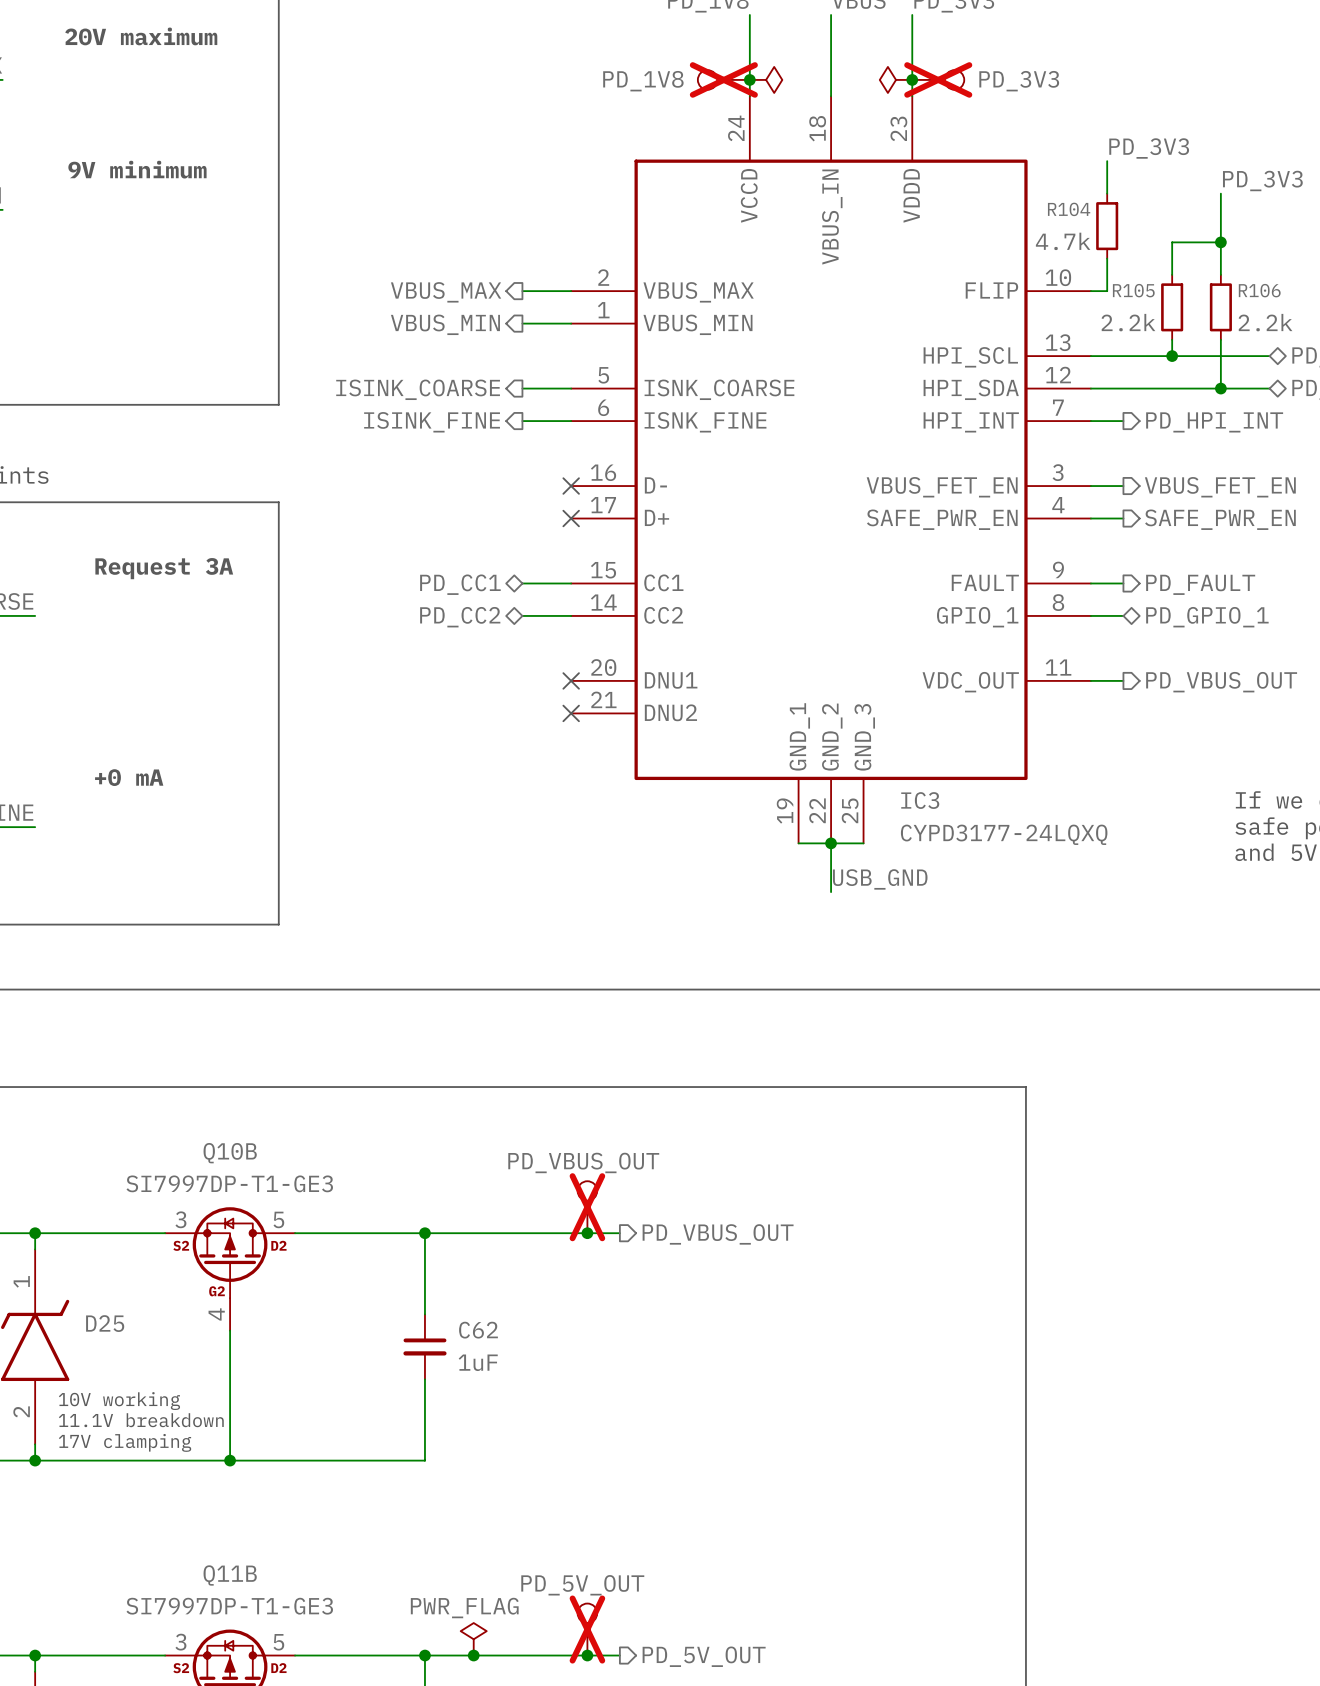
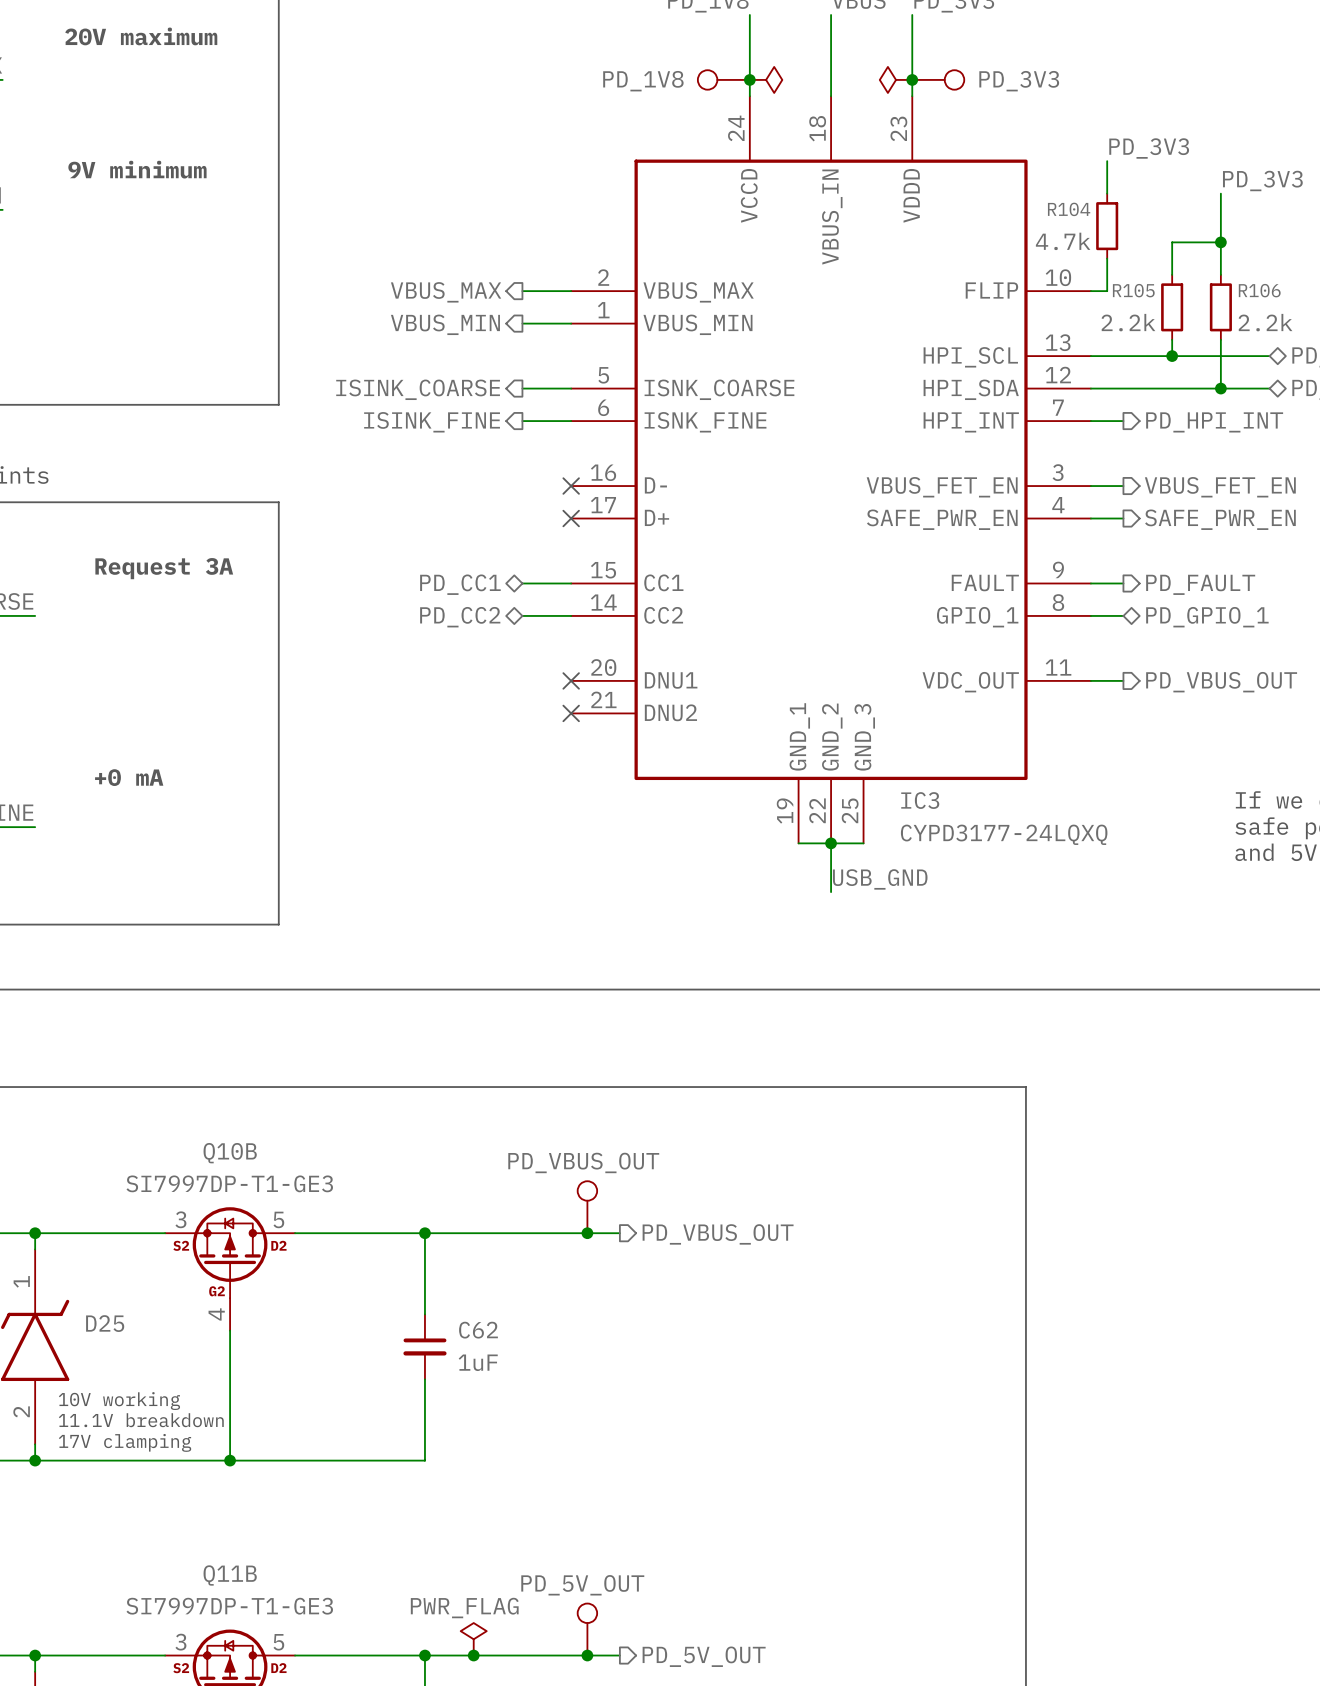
part do-not-place cross: (723, 79) -> none
part do-not-place cross: (938, 79) -> none
part do-not-place cross: (587, 1207) -> none
part do-not-place cross: (587, 1629) -> none

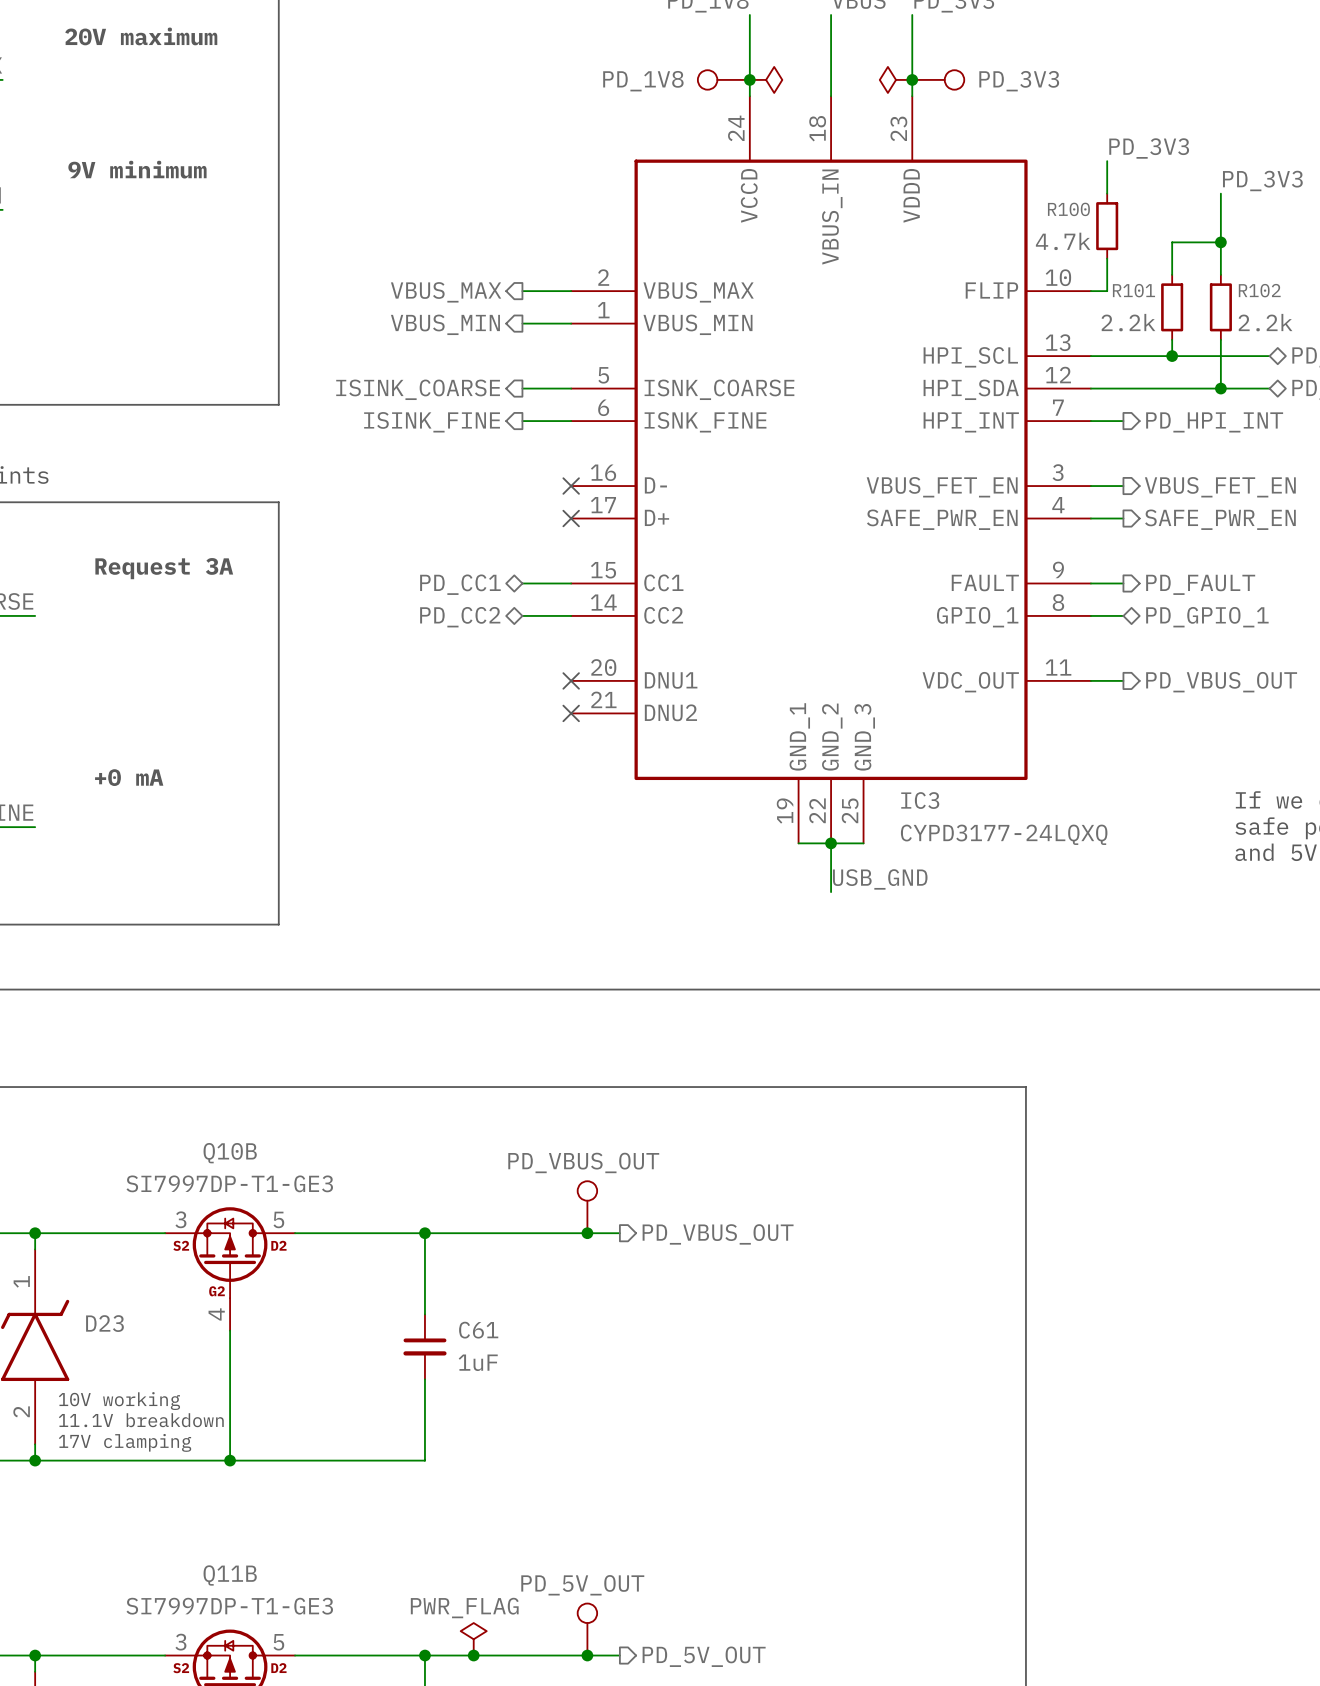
R104 name: R104 (1069, 209) -> R100 (1068, 209)
R105 name: R105 (1133, 290) -> R101 (1133, 290)
R106 name: R106 (1259, 290) -> R102 (1259, 290)
D25 name: D25 (105, 1323) -> D23 (104, 1323)
C62 name: C62 (478, 1330) -> C61 (478, 1330)

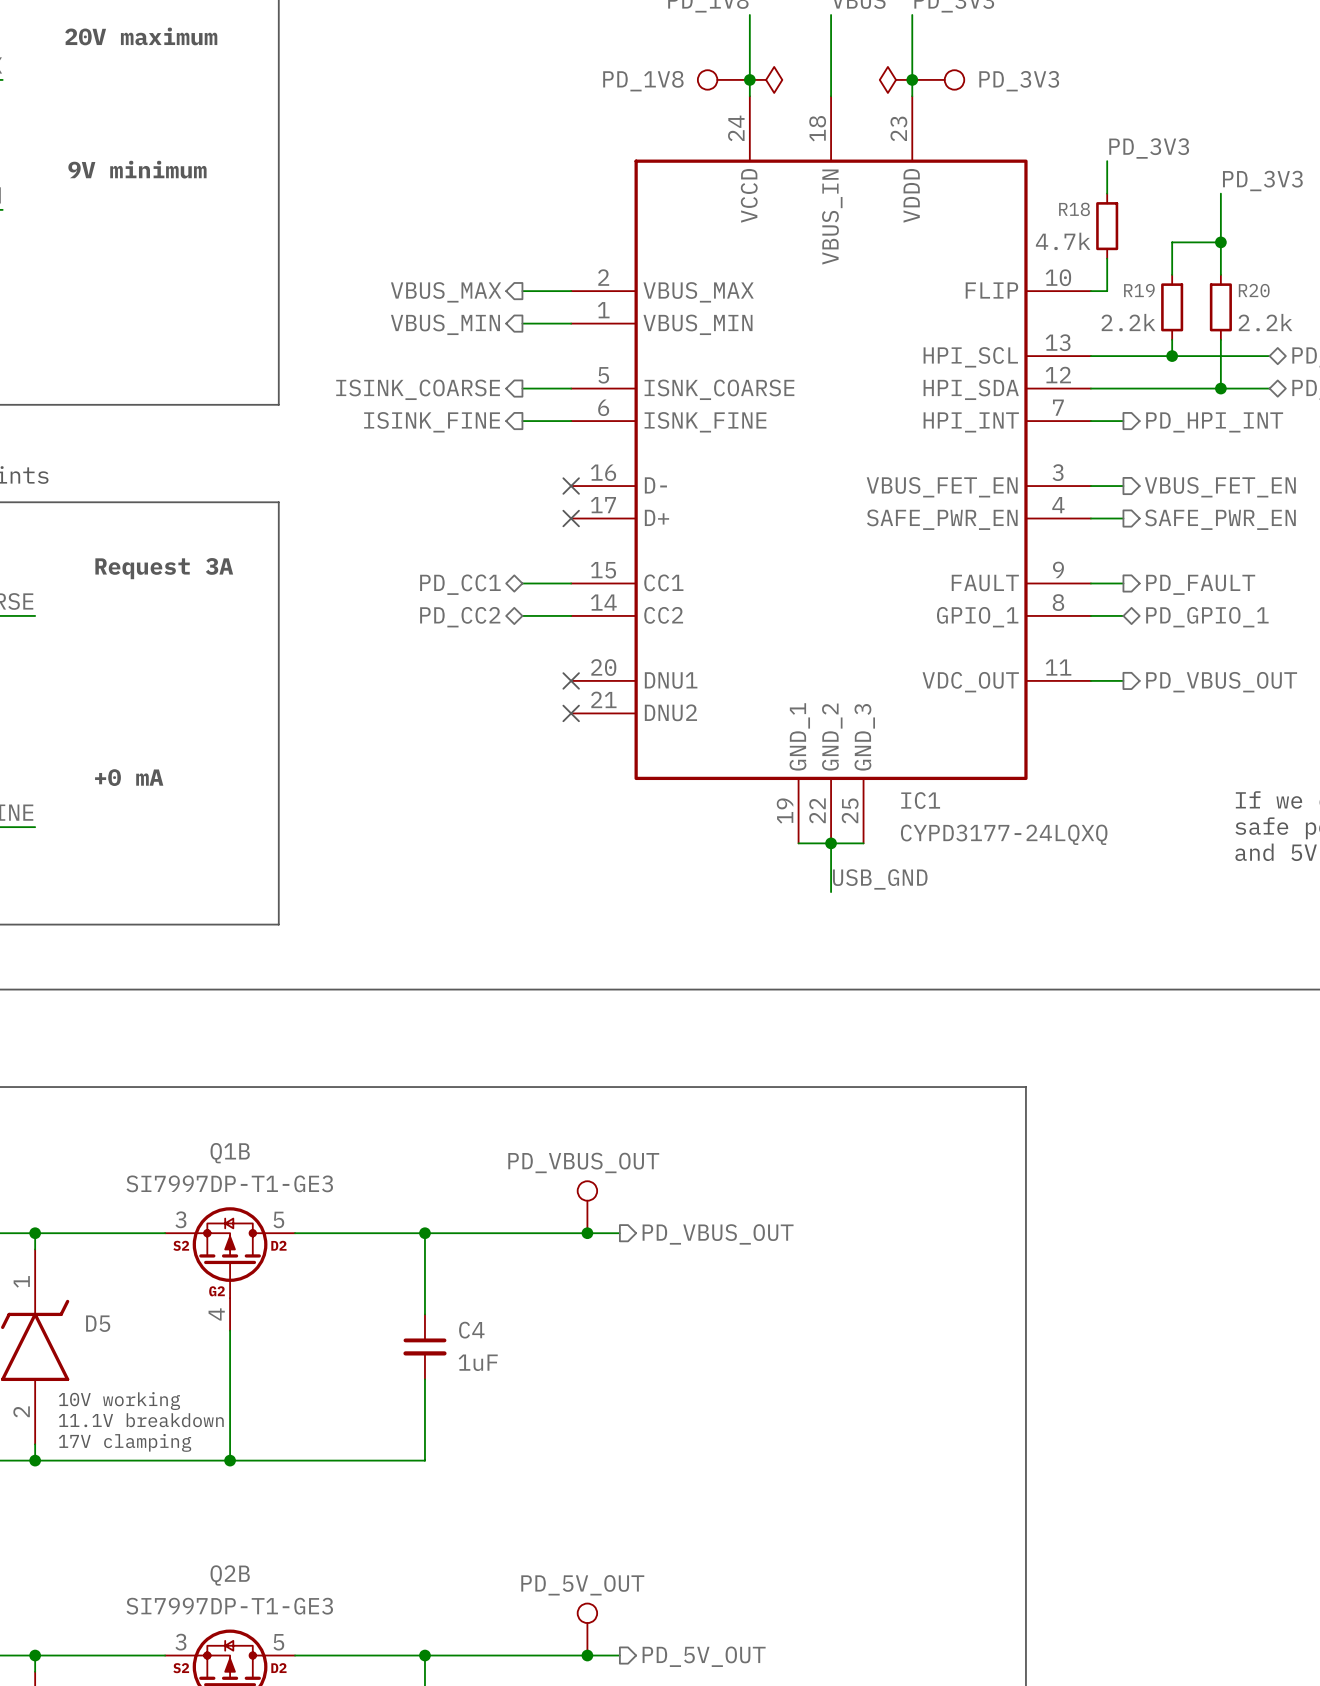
R100 name: R100 (1068, 209) -> R18 (1074, 209)
R101 name: R101 (1133, 290) -> R19 (1139, 290)
R102 name: R102 (1259, 290) -> R20 (1254, 290)
IC3 name: IC3 (920, 800) -> IC1 (920, 800)
Q10B name: Q10B (230, 1153) -> Q1B (230, 1153)
D23 name: D23 (104, 1323) -> D5 (98, 1323)
C61 name: C61 (478, 1330) -> C4 (471, 1330)
Q11B name: Q11B (230, 1575) -> Q2B (230, 1575)
power symbol: PWR_FLAG (473, 1639) -> none
junction: (473, 1655) -> none

